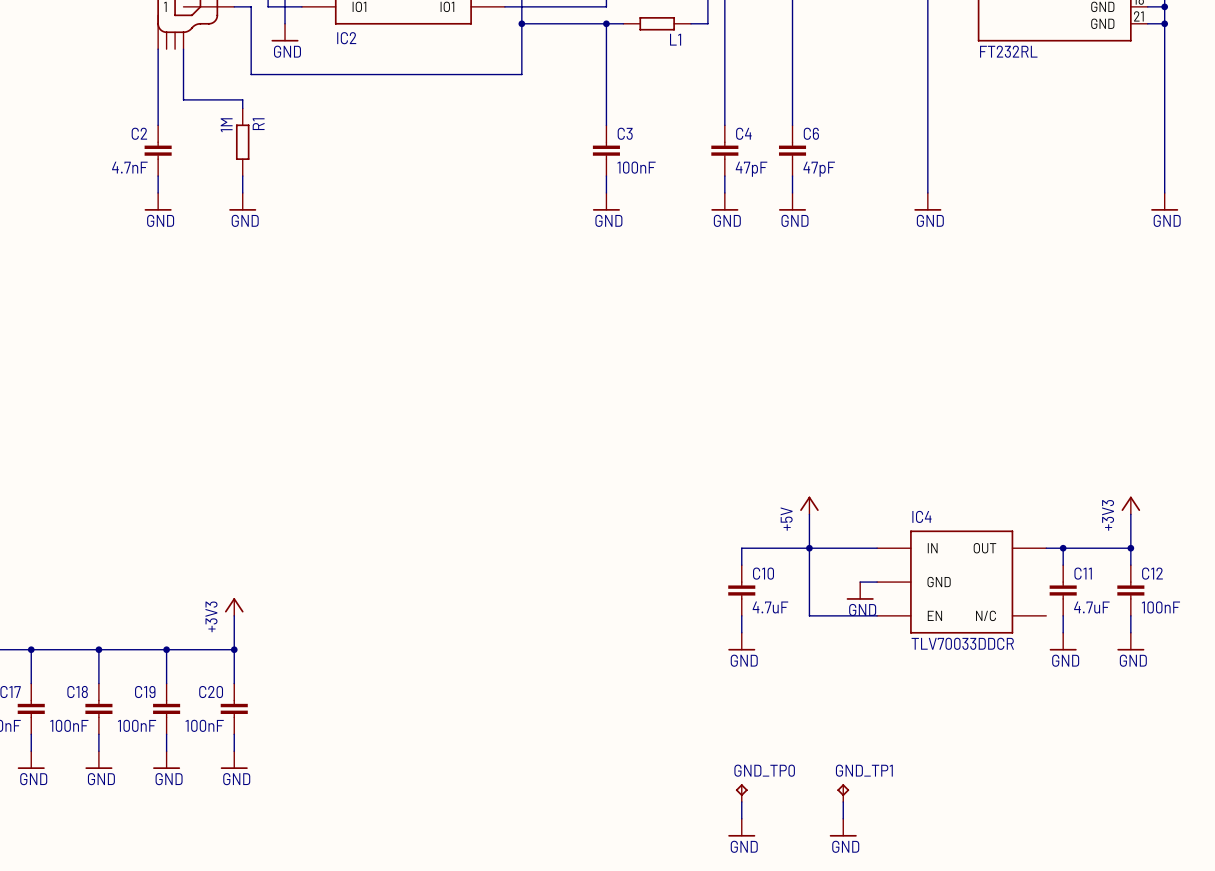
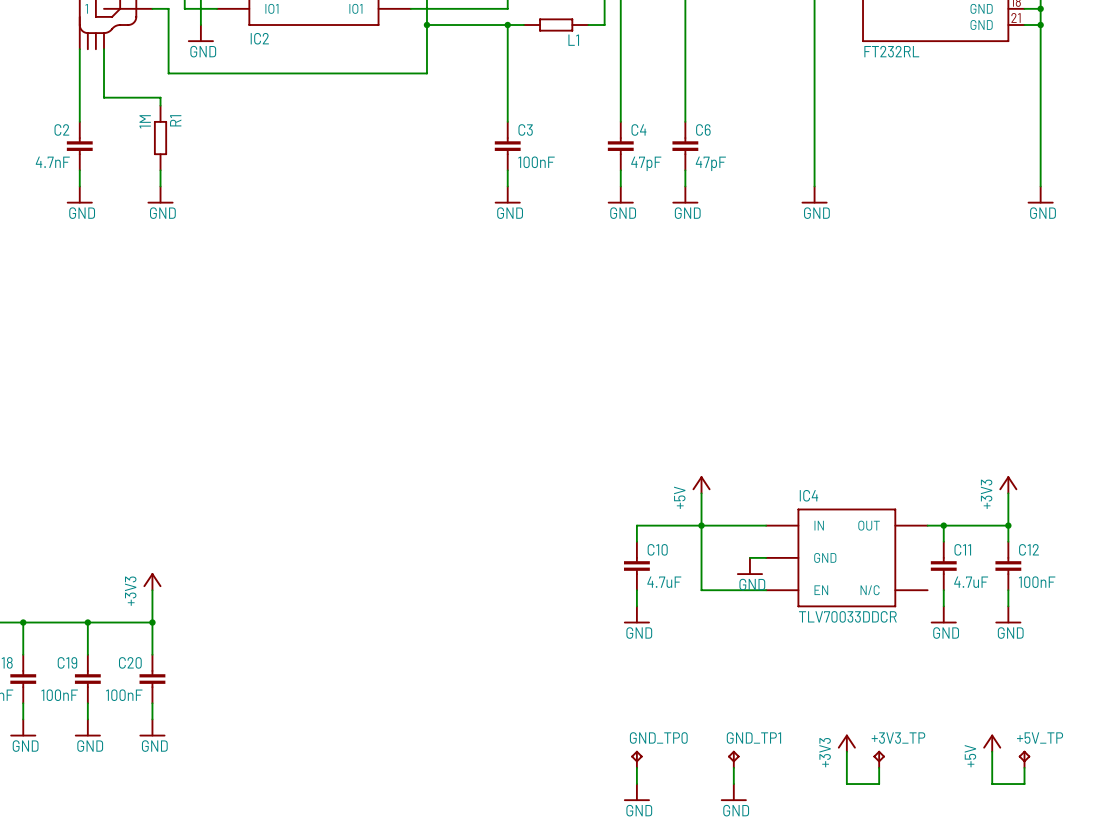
power symbol: none -> +3V3 (846, 743)
power symbol: none -> +5V (992, 743)
wire: none -> (846, 751) (846, 784) (879, 784) (879, 767)
wire: none -> (992, 751) (992, 784) (1024, 784) (1024, 767)
+3V3_TP: none -> (879, 759)
+5V_TP: none -> (1024, 759)

